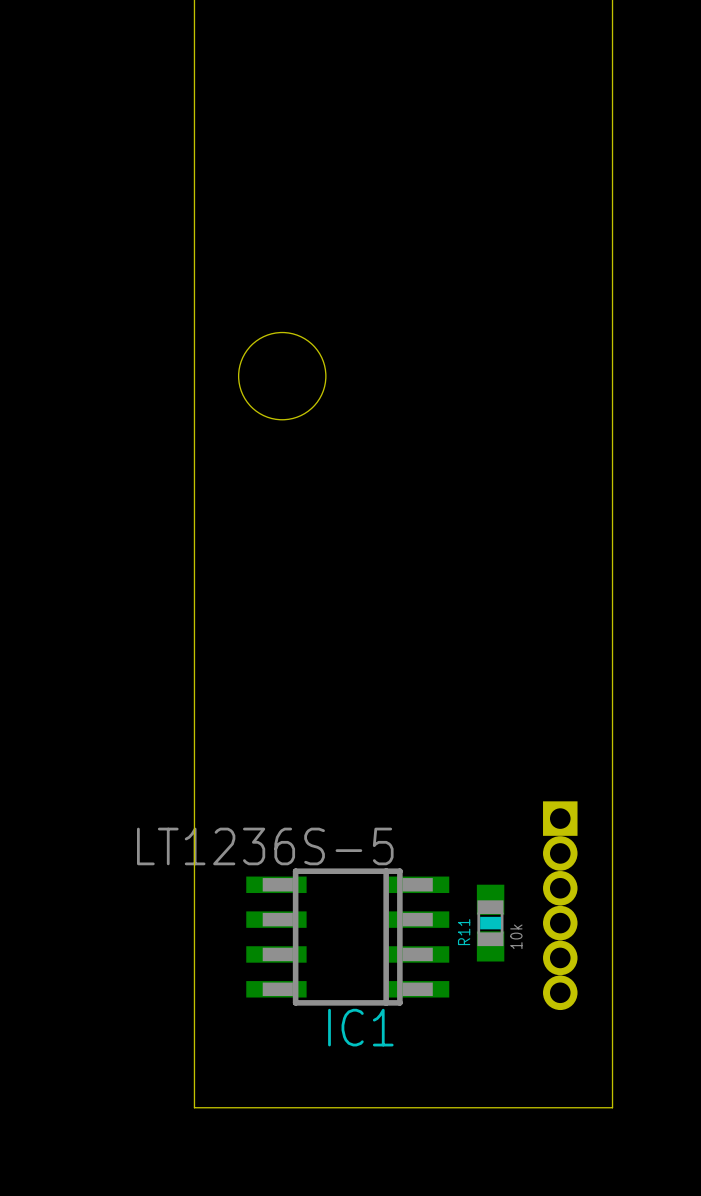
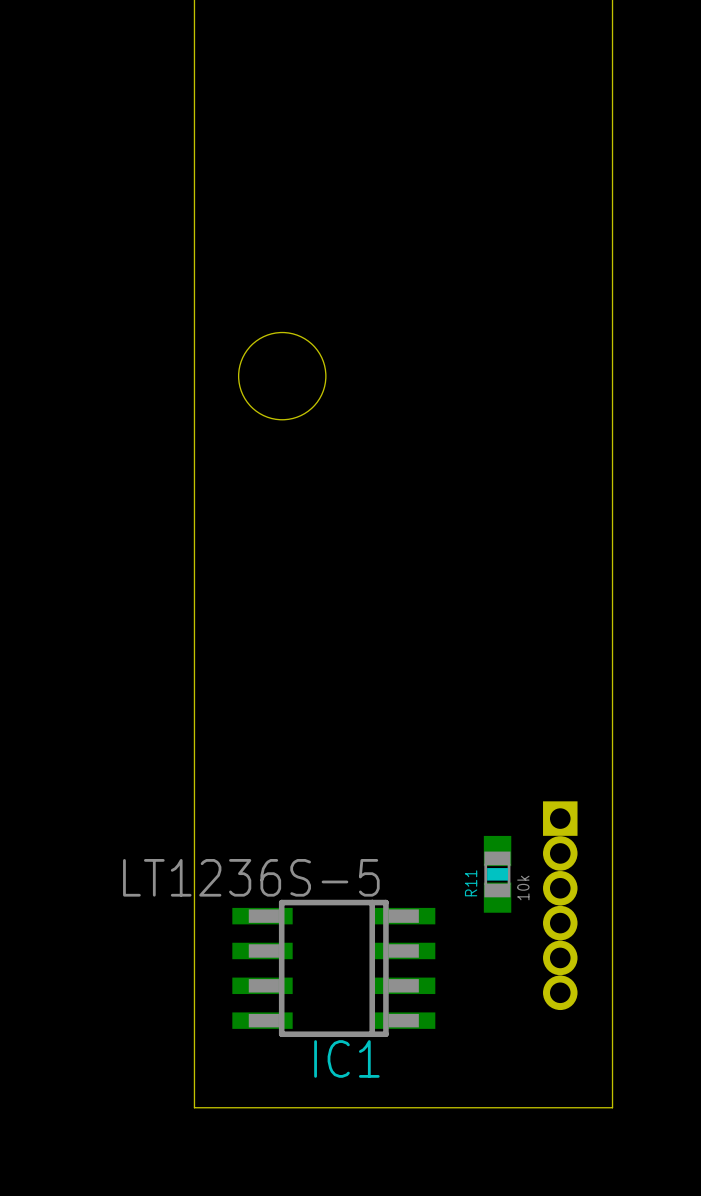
R11 position: (490, 923) -> (497, 874)
IC1 position: (347, 937) -> (333, 968)

